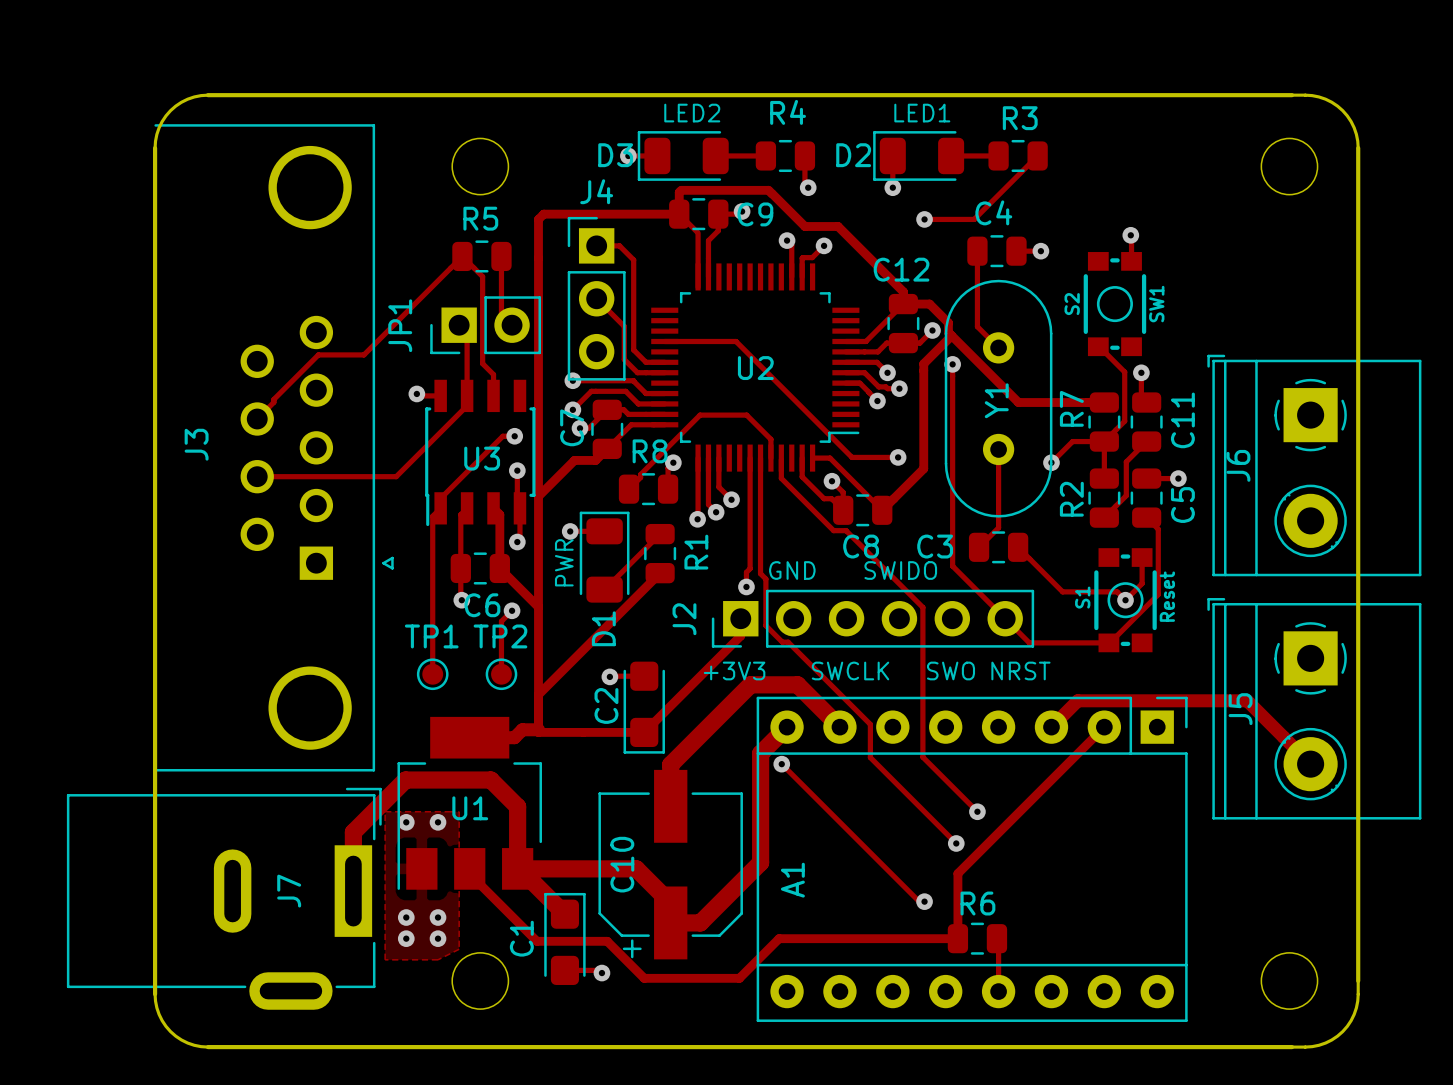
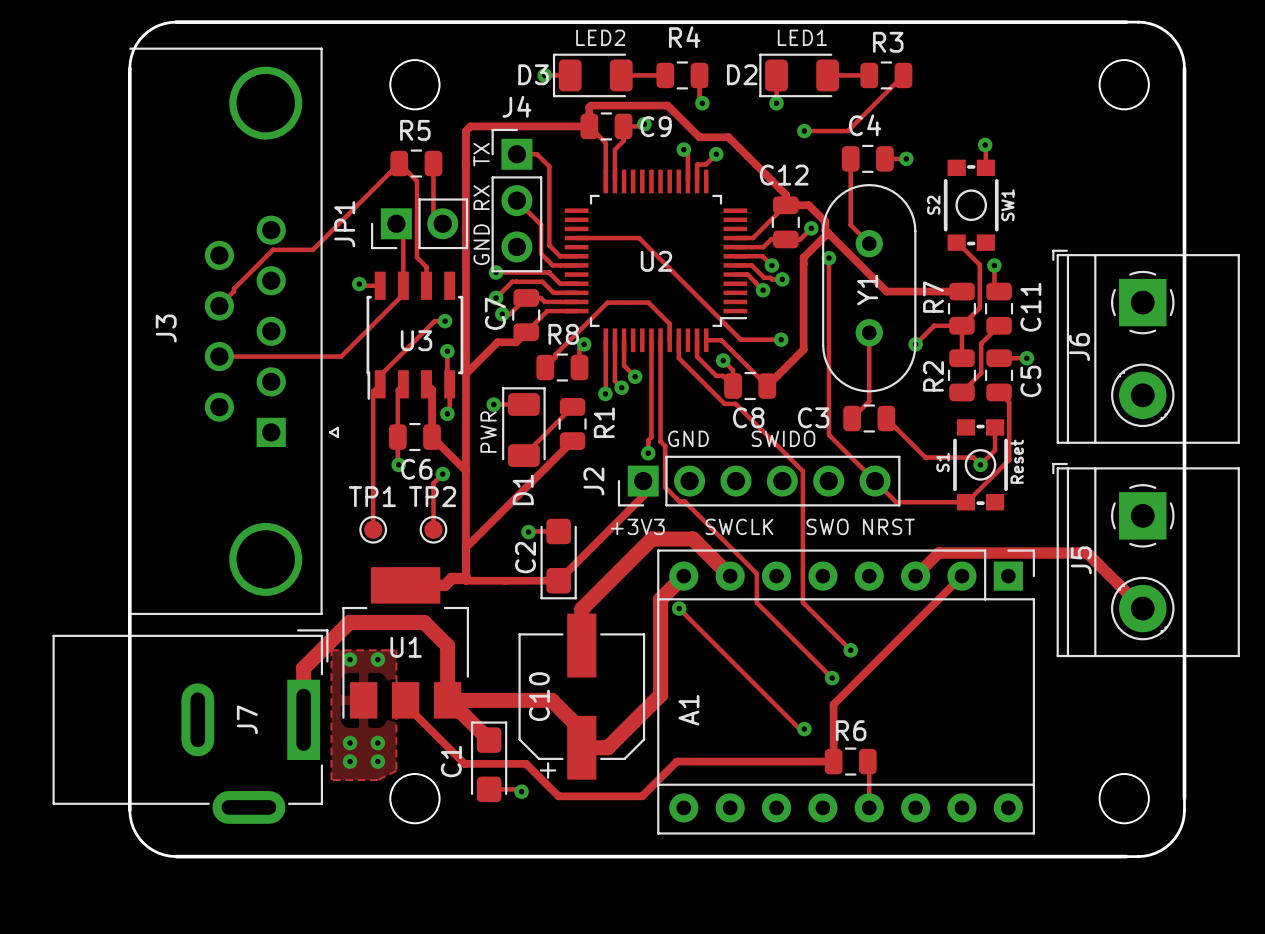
text: none -> TX (481, 154)
text: none -> RX (481, 197)
text: none -> GND (481, 244)

